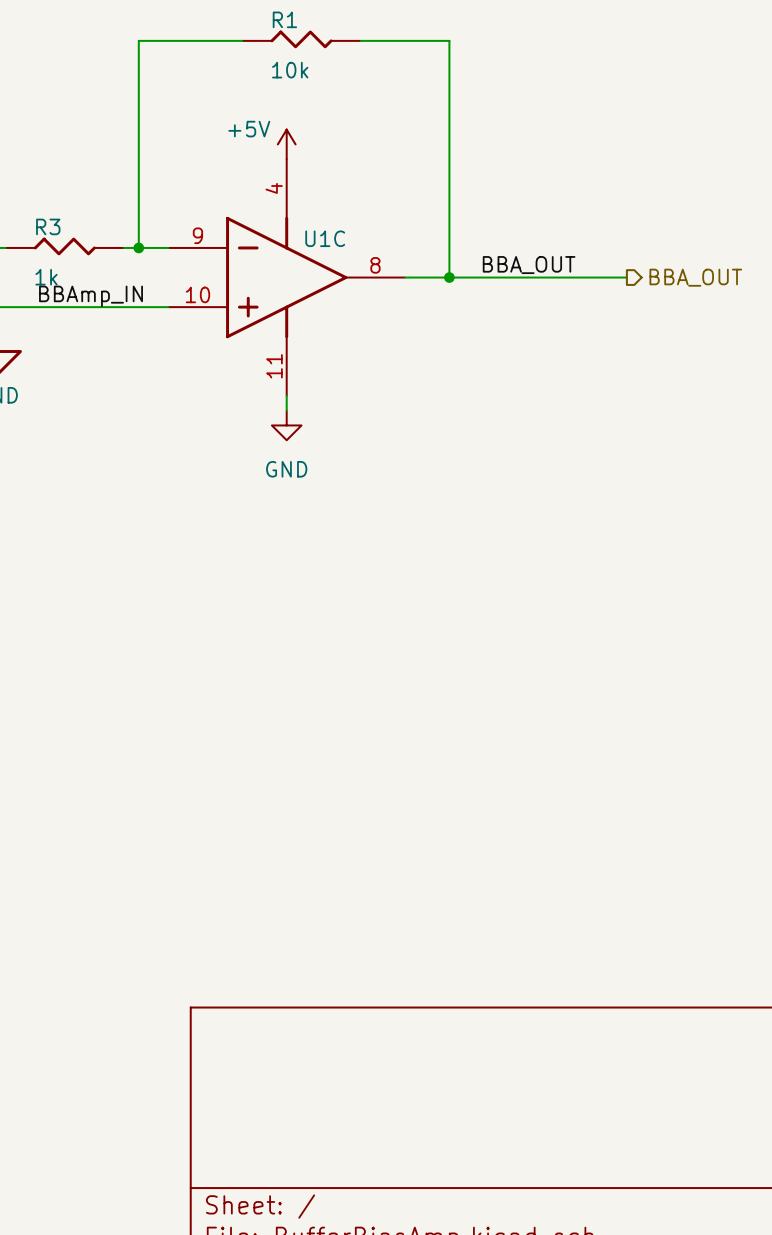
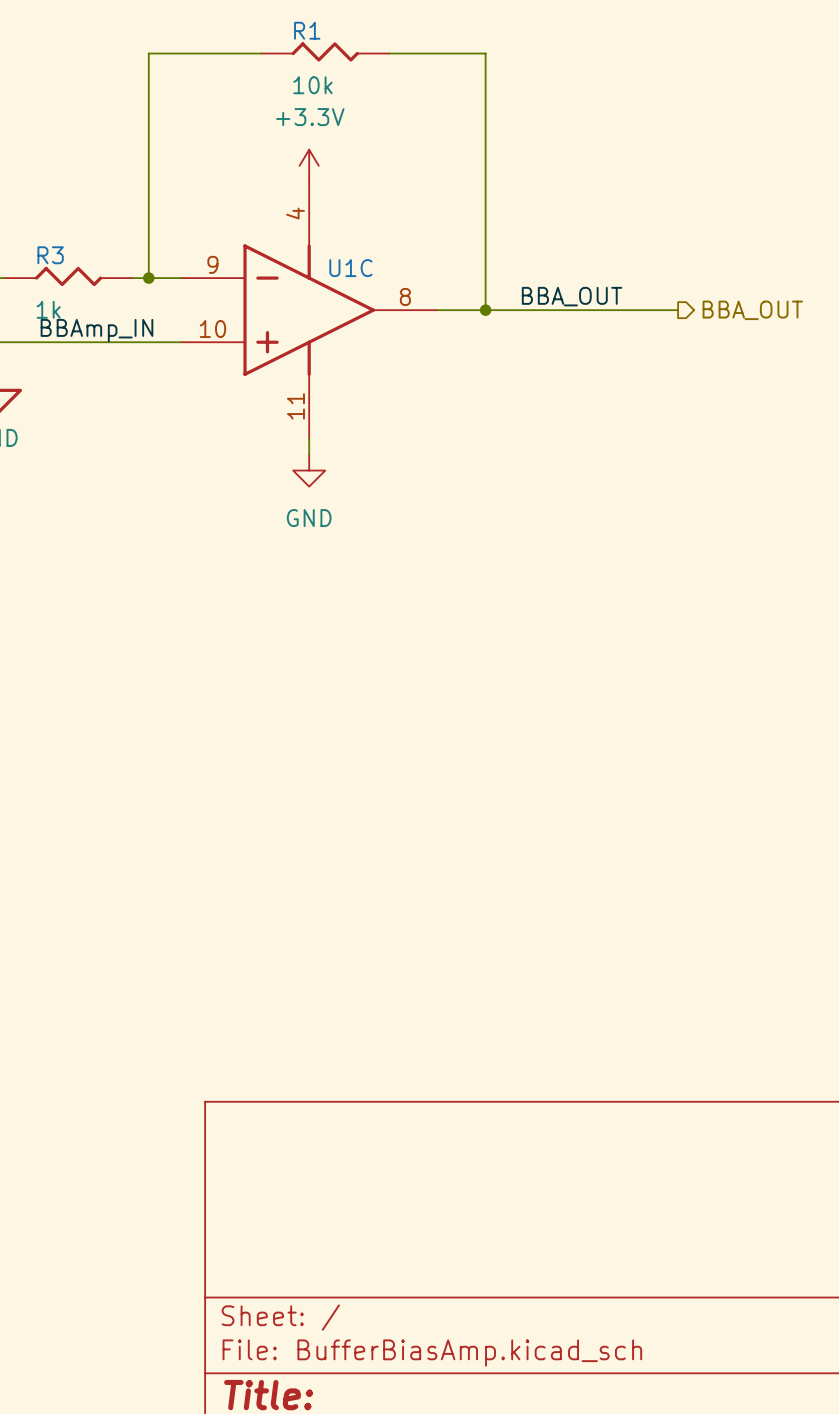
power symbol: +5V (286, 144) -> +3.3V (309, 165)

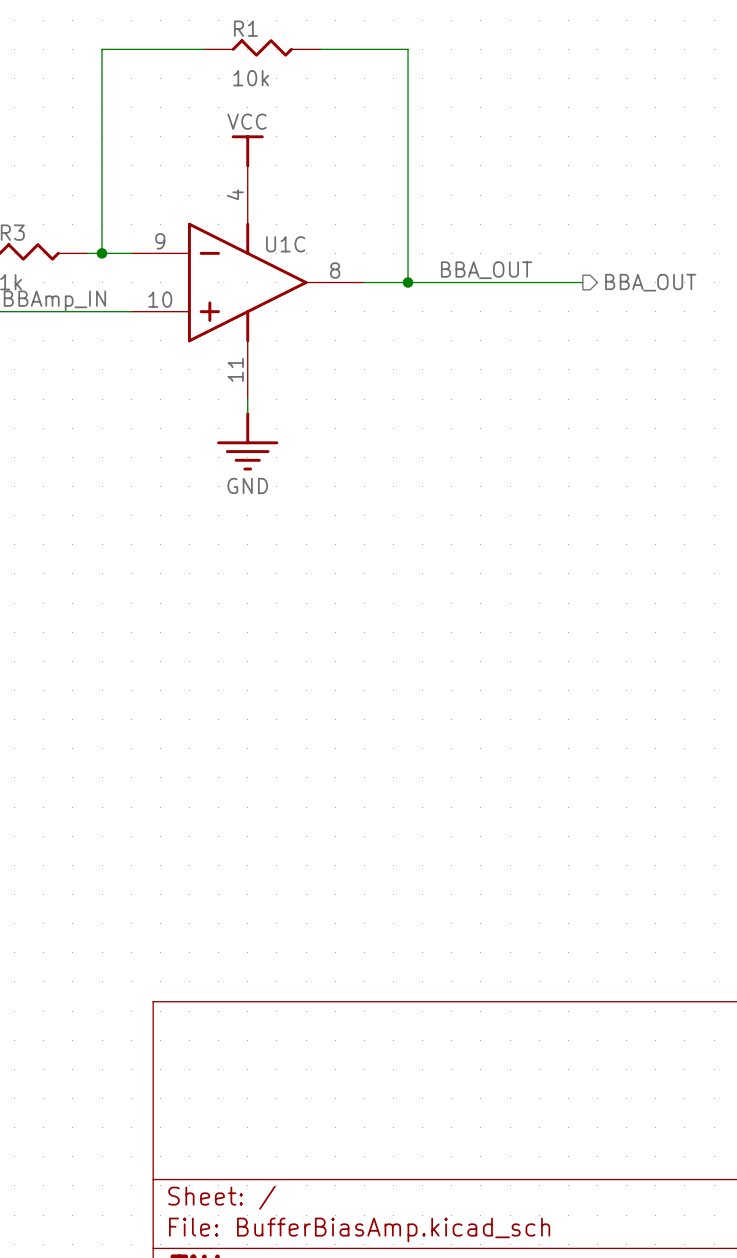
power symbol: +3.3V (309, 165) -> VCC (247, 151)
power symbol: GND (309, 470) -> none
power symbol: none -> GND (247, 441)

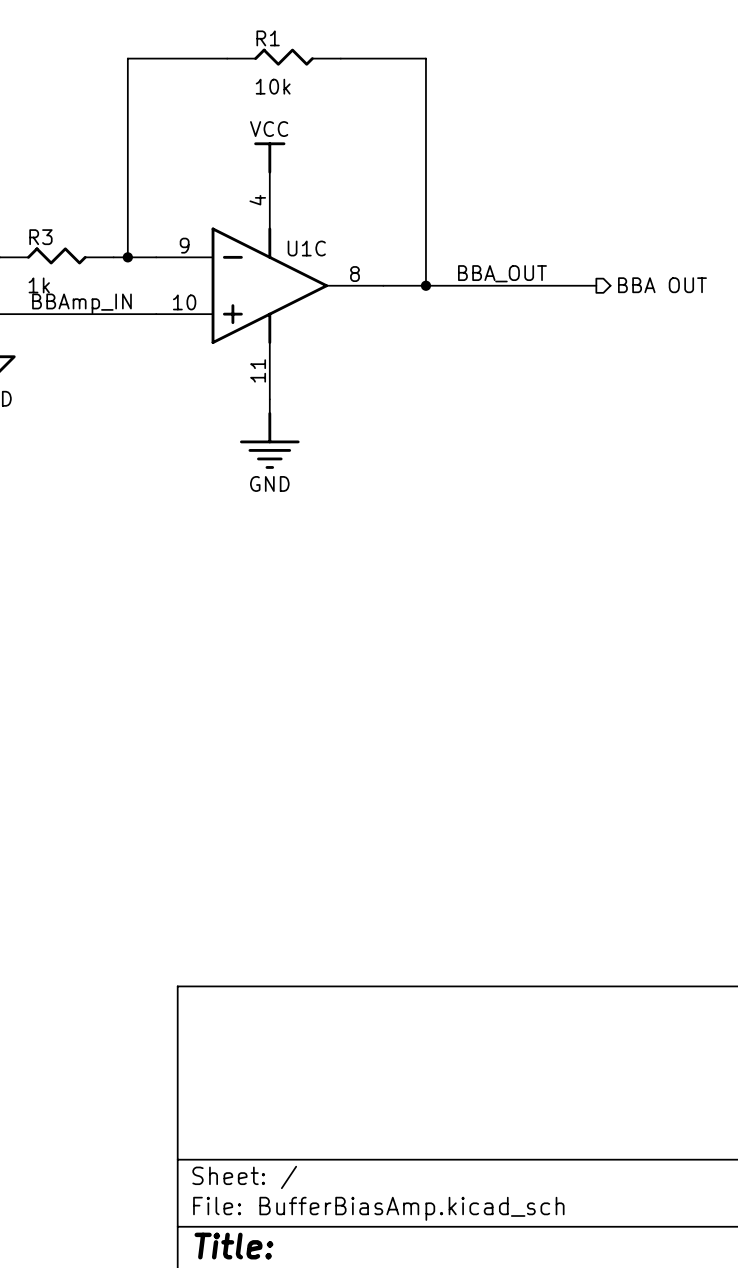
hierarchical label: BBA_OUT (650, 282) -> BBA OUT (662, 285)

